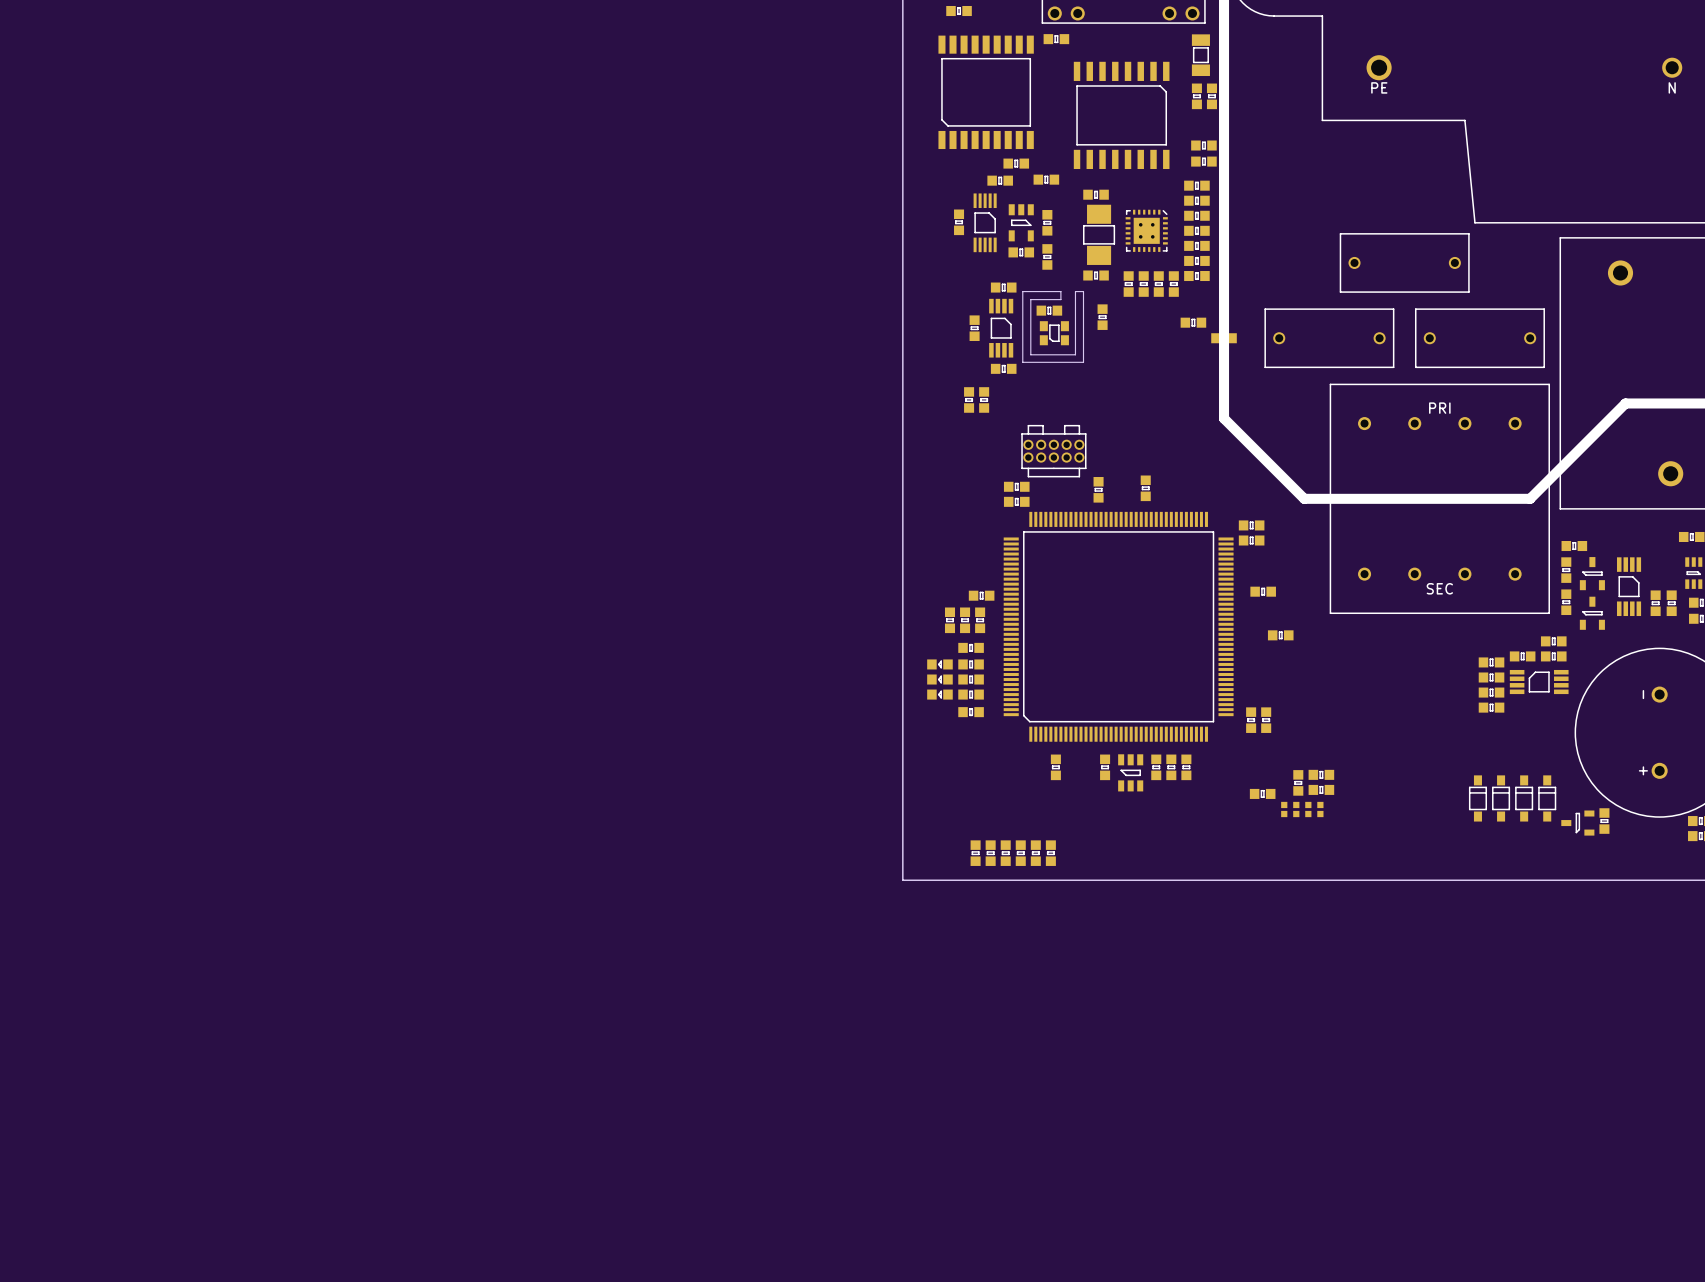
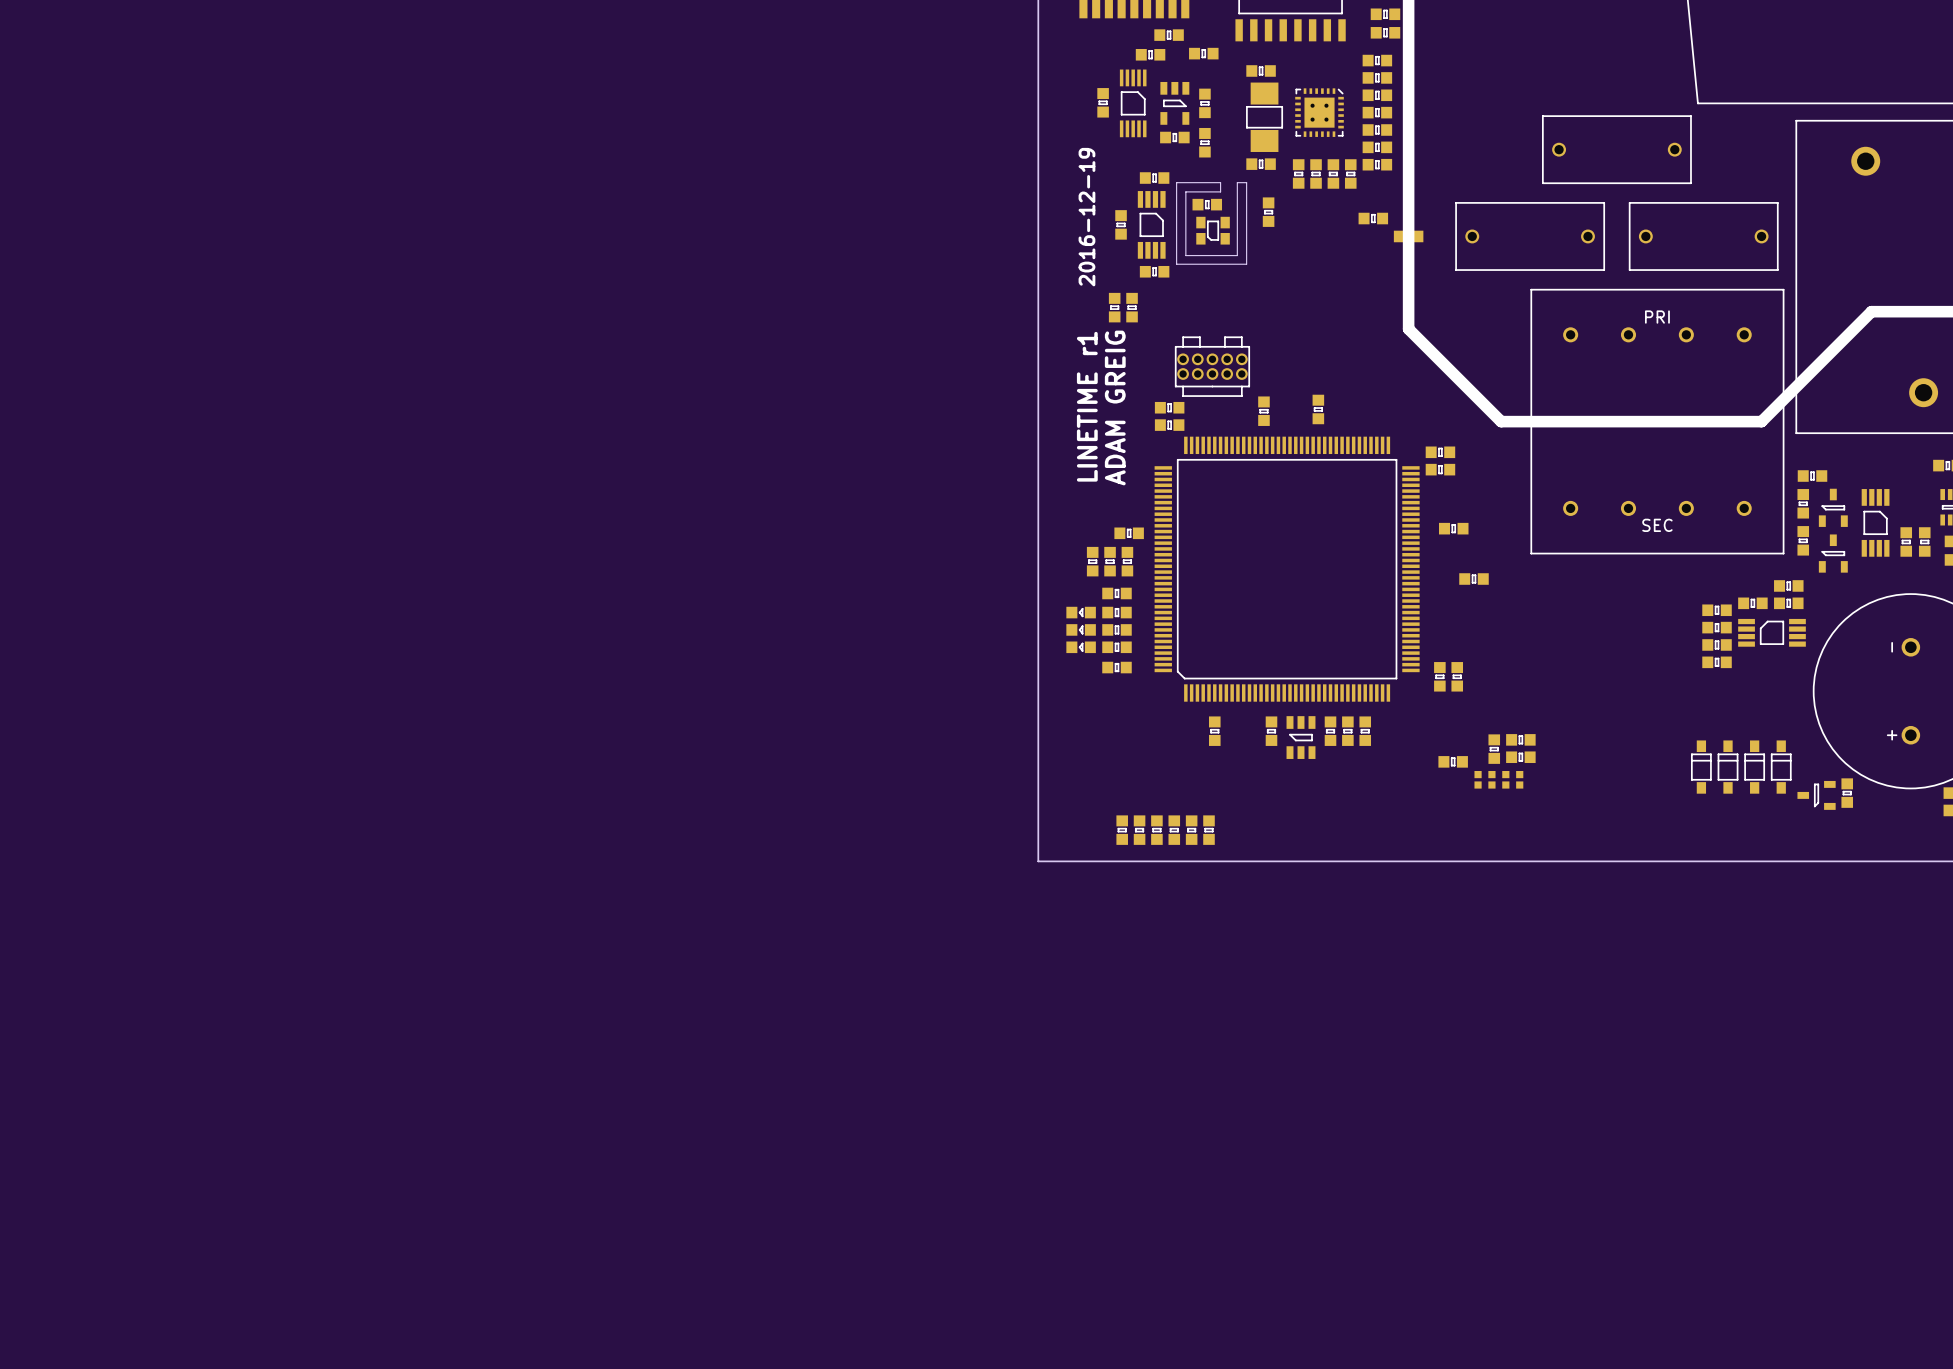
text: none -> 2016-12-19 (1086, 217)
text: none -> LINETIME r1 (1087, 406)
text: none -> ADAM GREIG (1115, 407)

